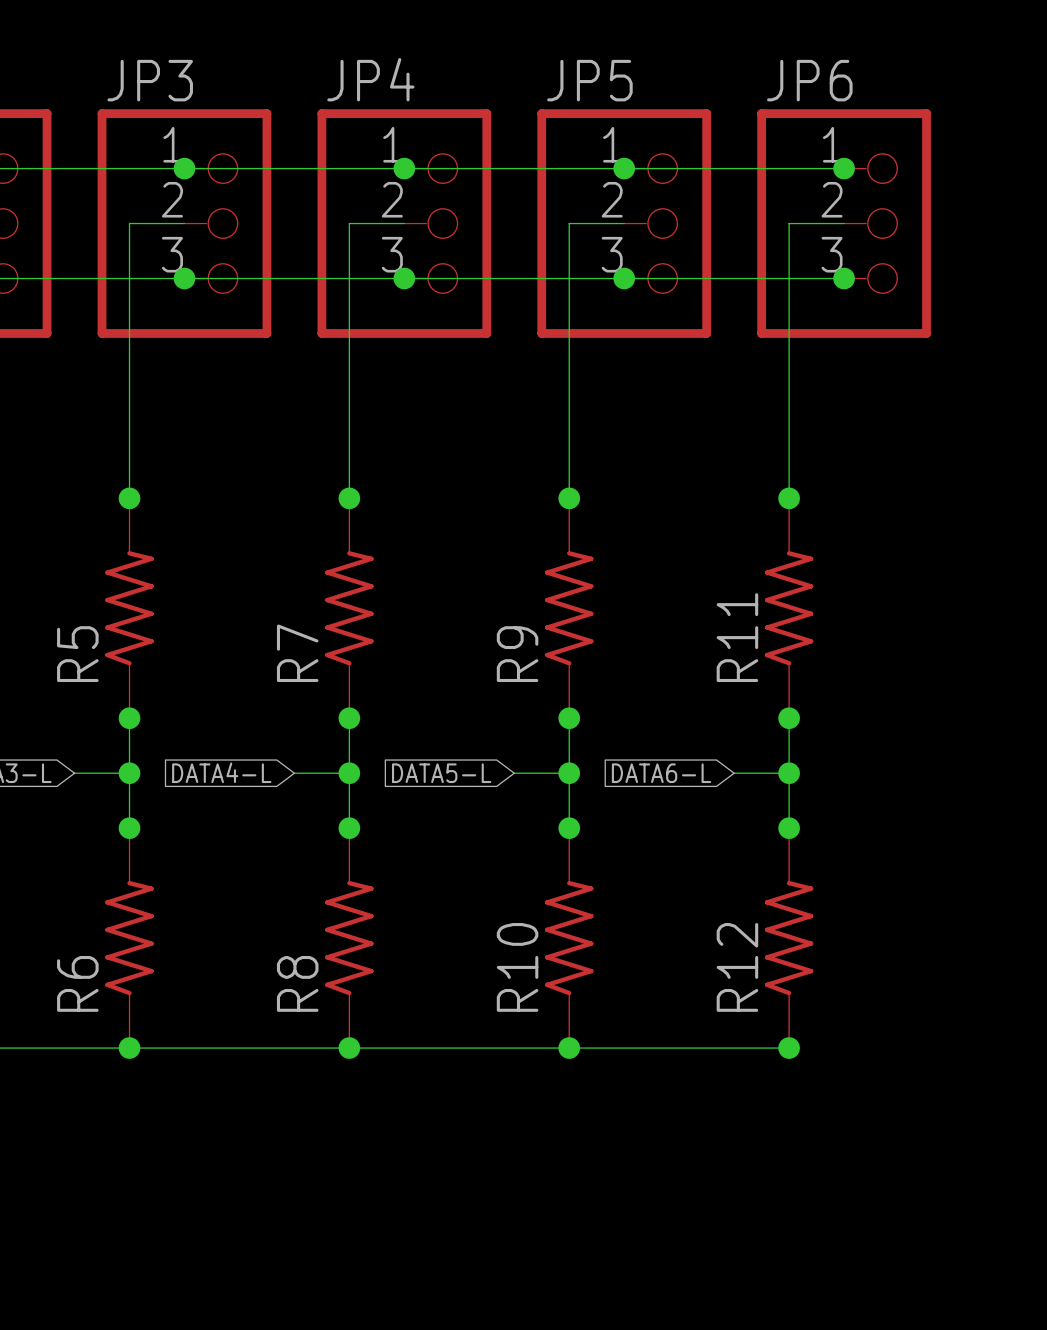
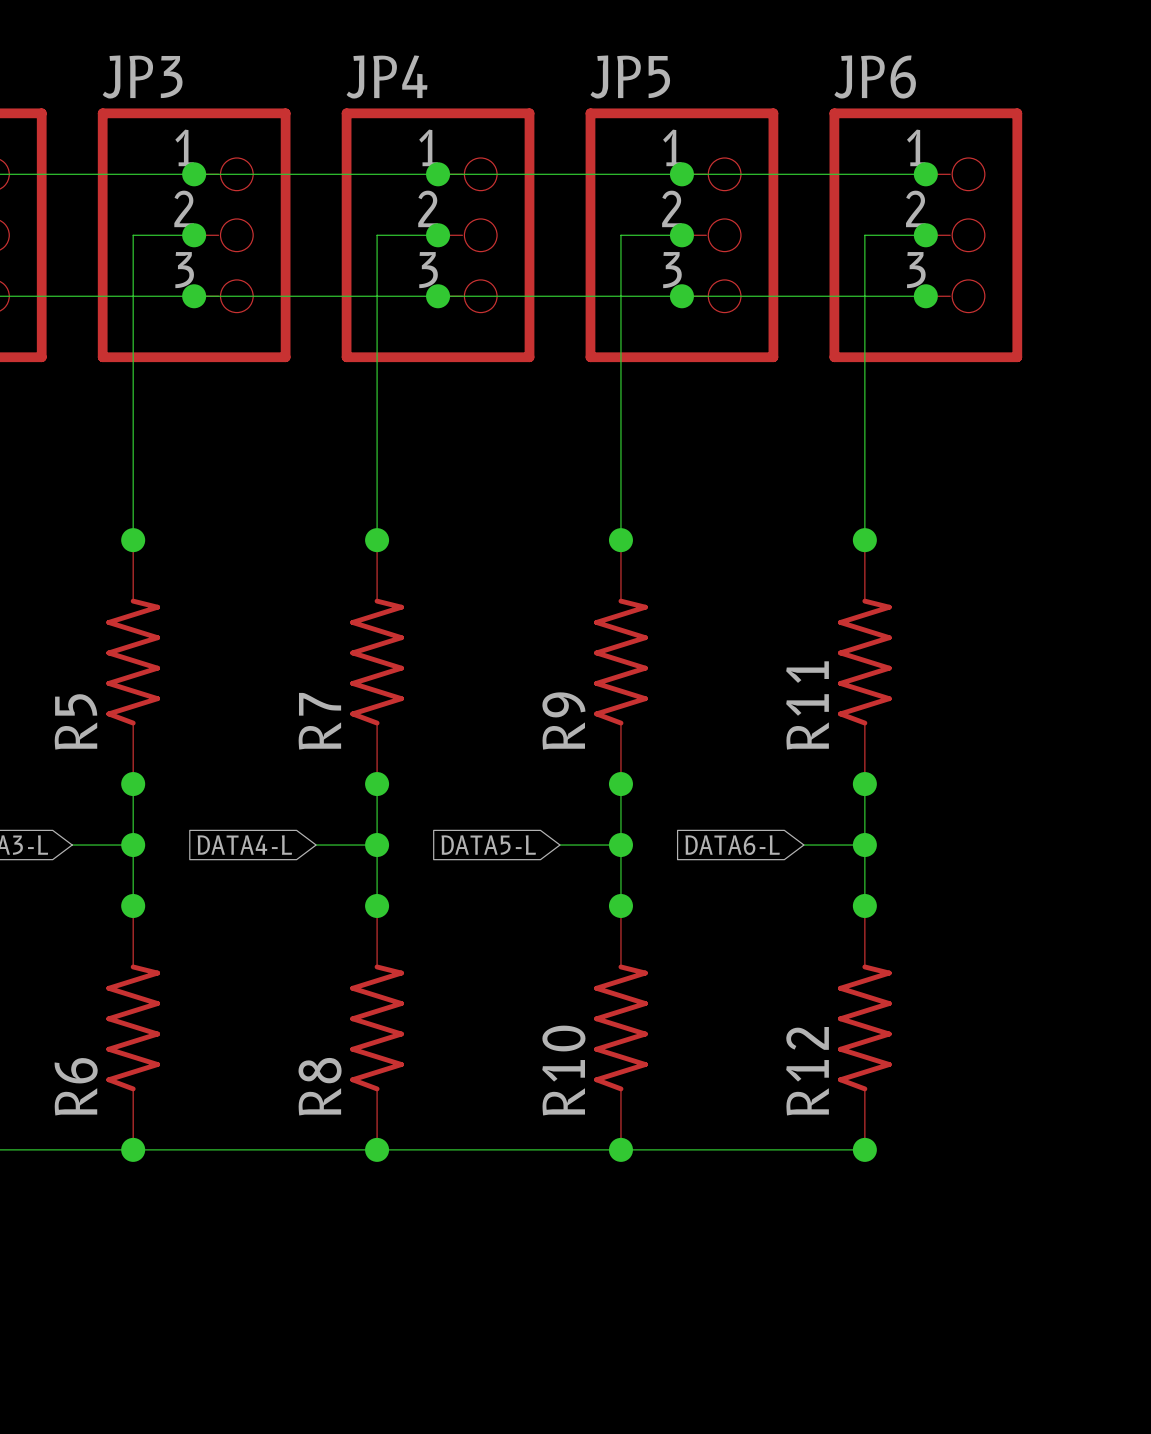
junction: none -> (194, 235)
junction: none -> (438, 235)
junction: none -> (681, 235)
junction: none -> (925, 235)

